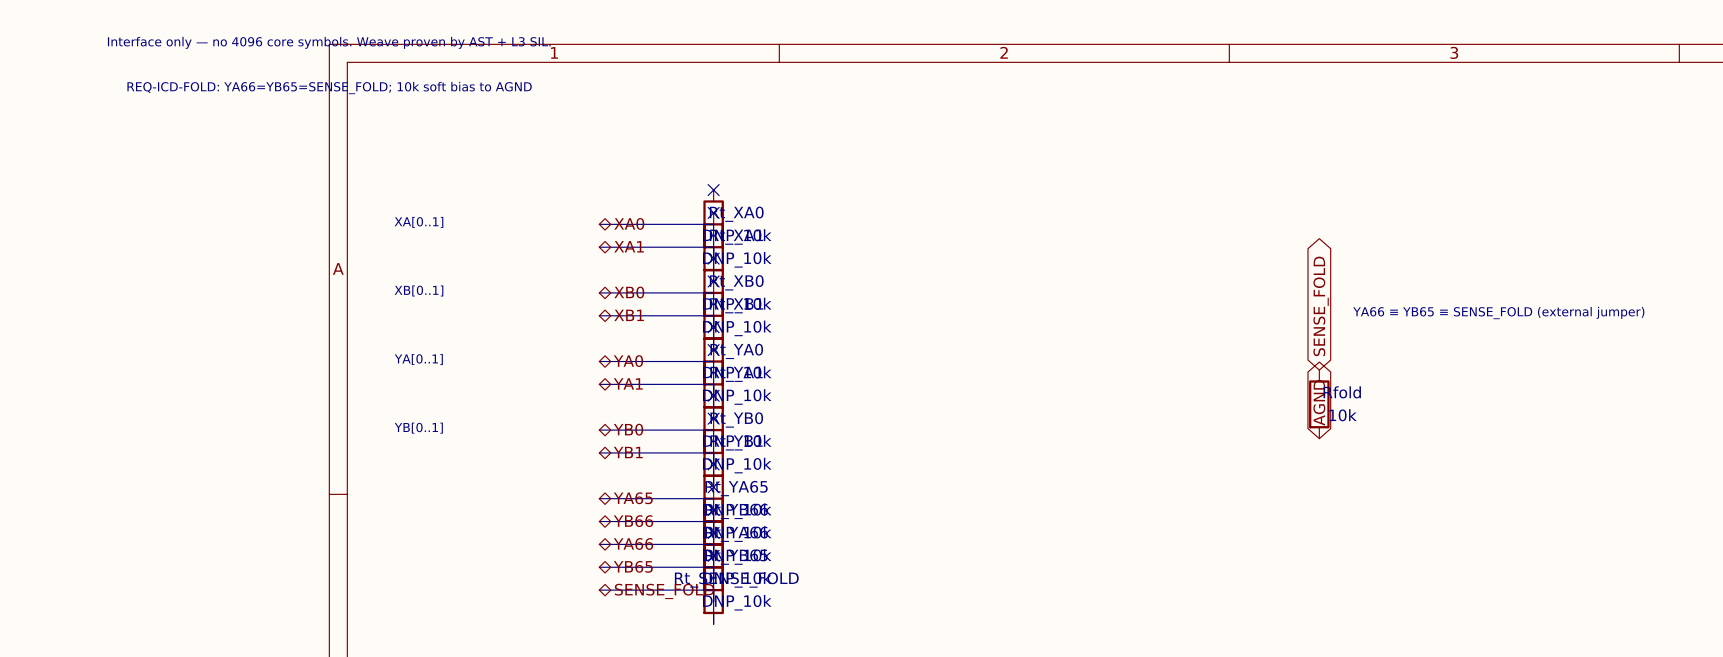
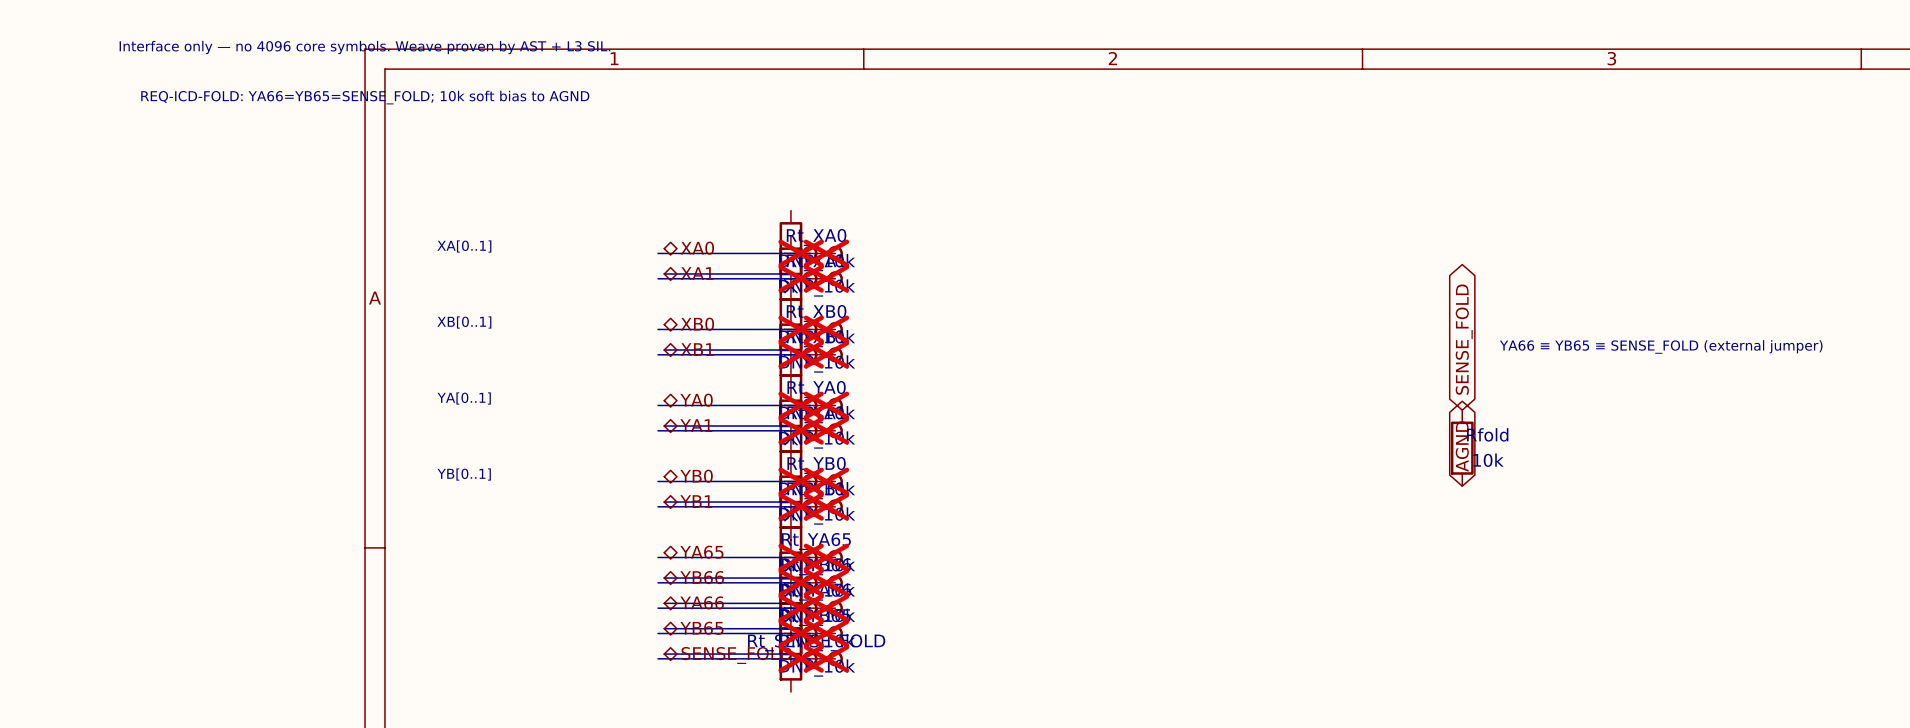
no-connect mark: (713, 190) -> none
no-connect mark: (713, 212) -> none
wire: (599, 224) (713, 224) (713, 281) -> none
wire: none -> (657, 253) (810, 253)
part: none -> (801, 253)
part: none -> (826, 253)
wire: none -> (657, 278) (810, 278)
part: none -> (801, 278)
part: none -> (826, 278)
no-connect mark: (713, 281) -> none
wire: (599, 292) (713, 292) (713, 350) -> none
wire: none -> (657, 329) (810, 329)
part: none -> (801, 329)
part: none -> (826, 329)
wire: none -> (657, 354) (810, 354)
part: none -> (801, 354)
part: none -> (826, 354)
no-connect mark: (713, 327) -> none
no-connect mark: (713, 350) -> none
wire: (599, 361) (713, 361) (713, 418) -> none
wire: none -> (657, 405) (810, 405)
part: none -> (801, 405)
part: none -> (826, 405)
wire: none -> (657, 430) (810, 430)
part: none -> (801, 430)
part: none -> (826, 430)
no-connect mark: (713, 418) -> none
wire: (599, 430) (713, 430) (713, 487) -> none
wire: none -> (657, 481) (810, 481)
part: none -> (801, 481)
part: none -> (826, 481)
wire: none -> (657, 506) (810, 506)
part: none -> (801, 506)
part: none -> (826, 506)
no-connect mark: (713, 487) -> none
wire: (599, 498) (713, 498) (713, 624) -> none
wire: none -> (657, 557) (810, 557)
part: none -> (801, 557)
part: none -> (826, 557)
wire: none -> (657, 582) (810, 582)
part: none -> (801, 582)
part: none -> (826, 582)
wire: none -> (657, 608) (810, 608)
part: none -> (801, 608)
part: none -> (826, 608)
wire: none -> (657, 633) (810, 633)
part: none -> (801, 633)
part: none -> (826, 633)
wire: none -> (657, 658) (810, 658)
part: none -> (801, 658)
part: none -> (826, 658)

